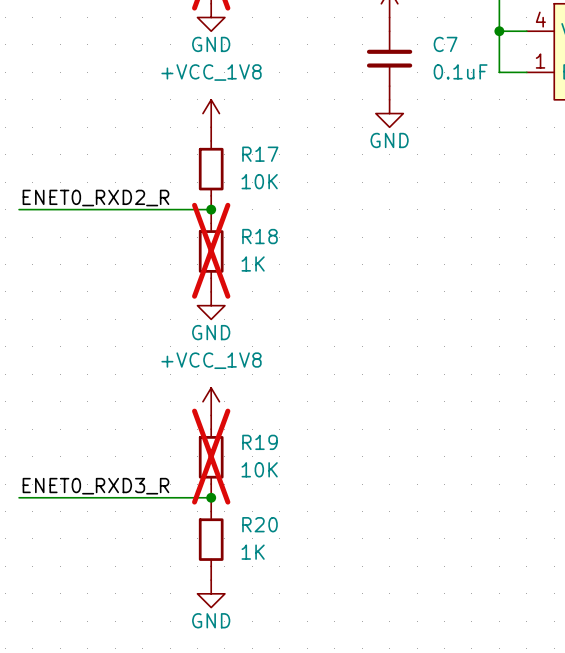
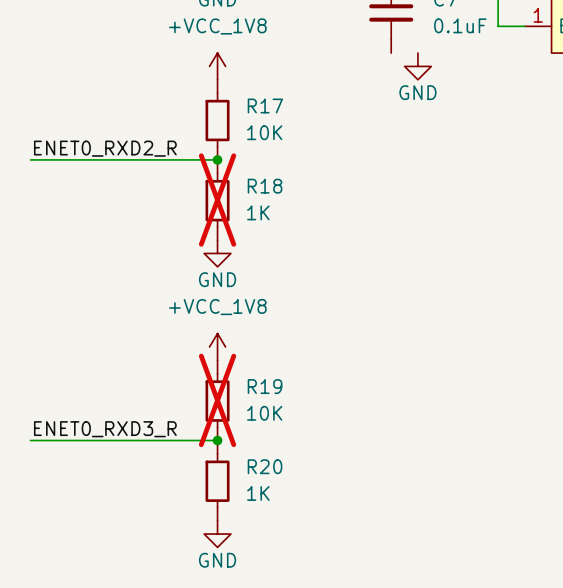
power symbol position: GND (389, 113) -> GND (417, 66)

